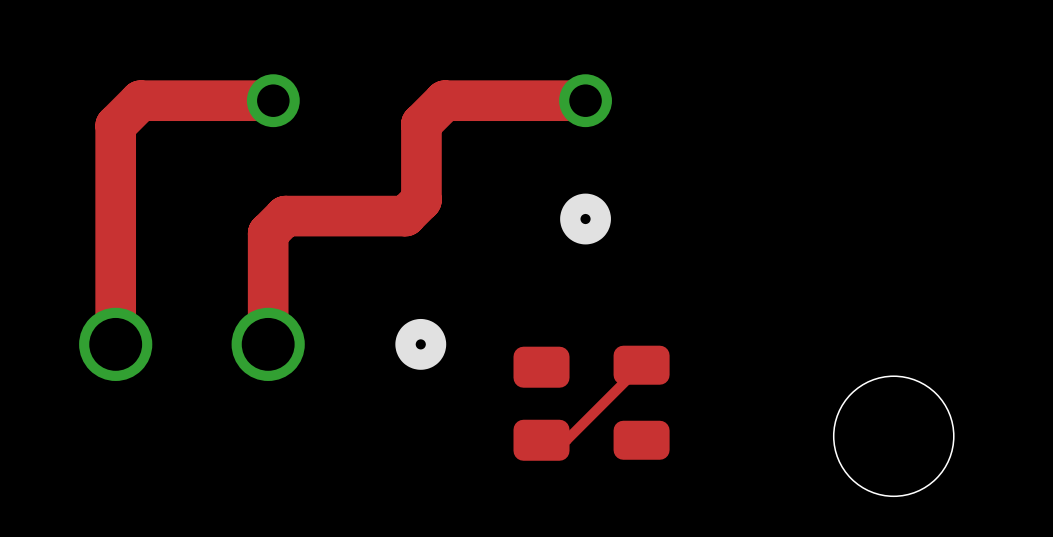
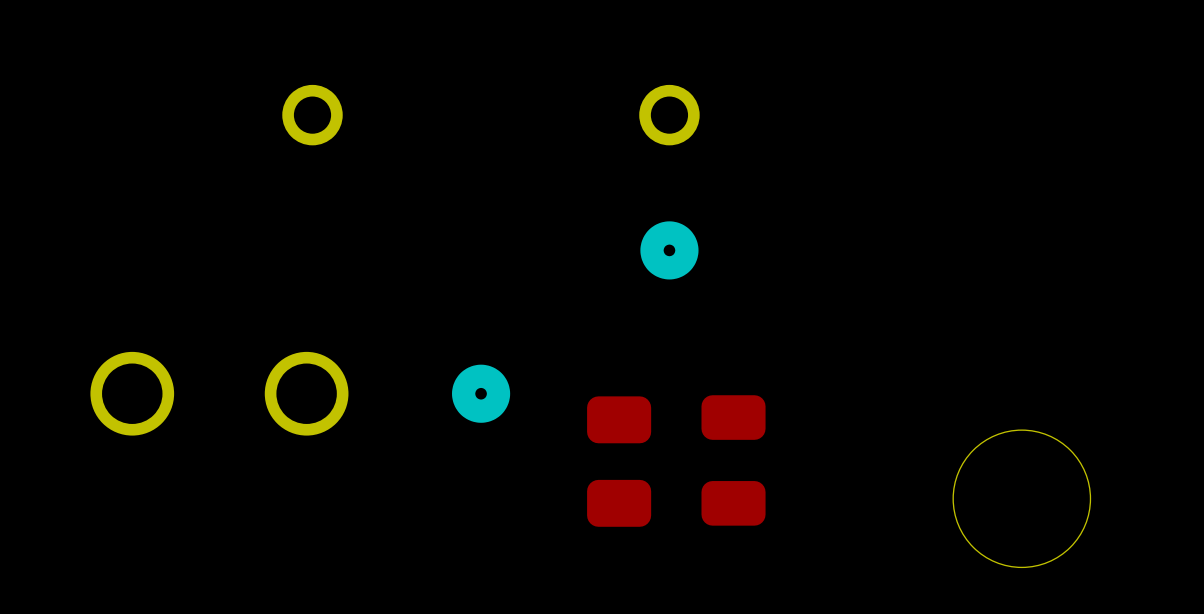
top track: (273, 100) (140, 100) (115, 125) (115, 344) -> none
top track: (585, 100) (444, 100) (421, 124) (421, 200) (405, 216) (285, 216) (268, 233) (268, 344) -> none
top track: (641, 365) (566, 440) (541, 440) -> none

